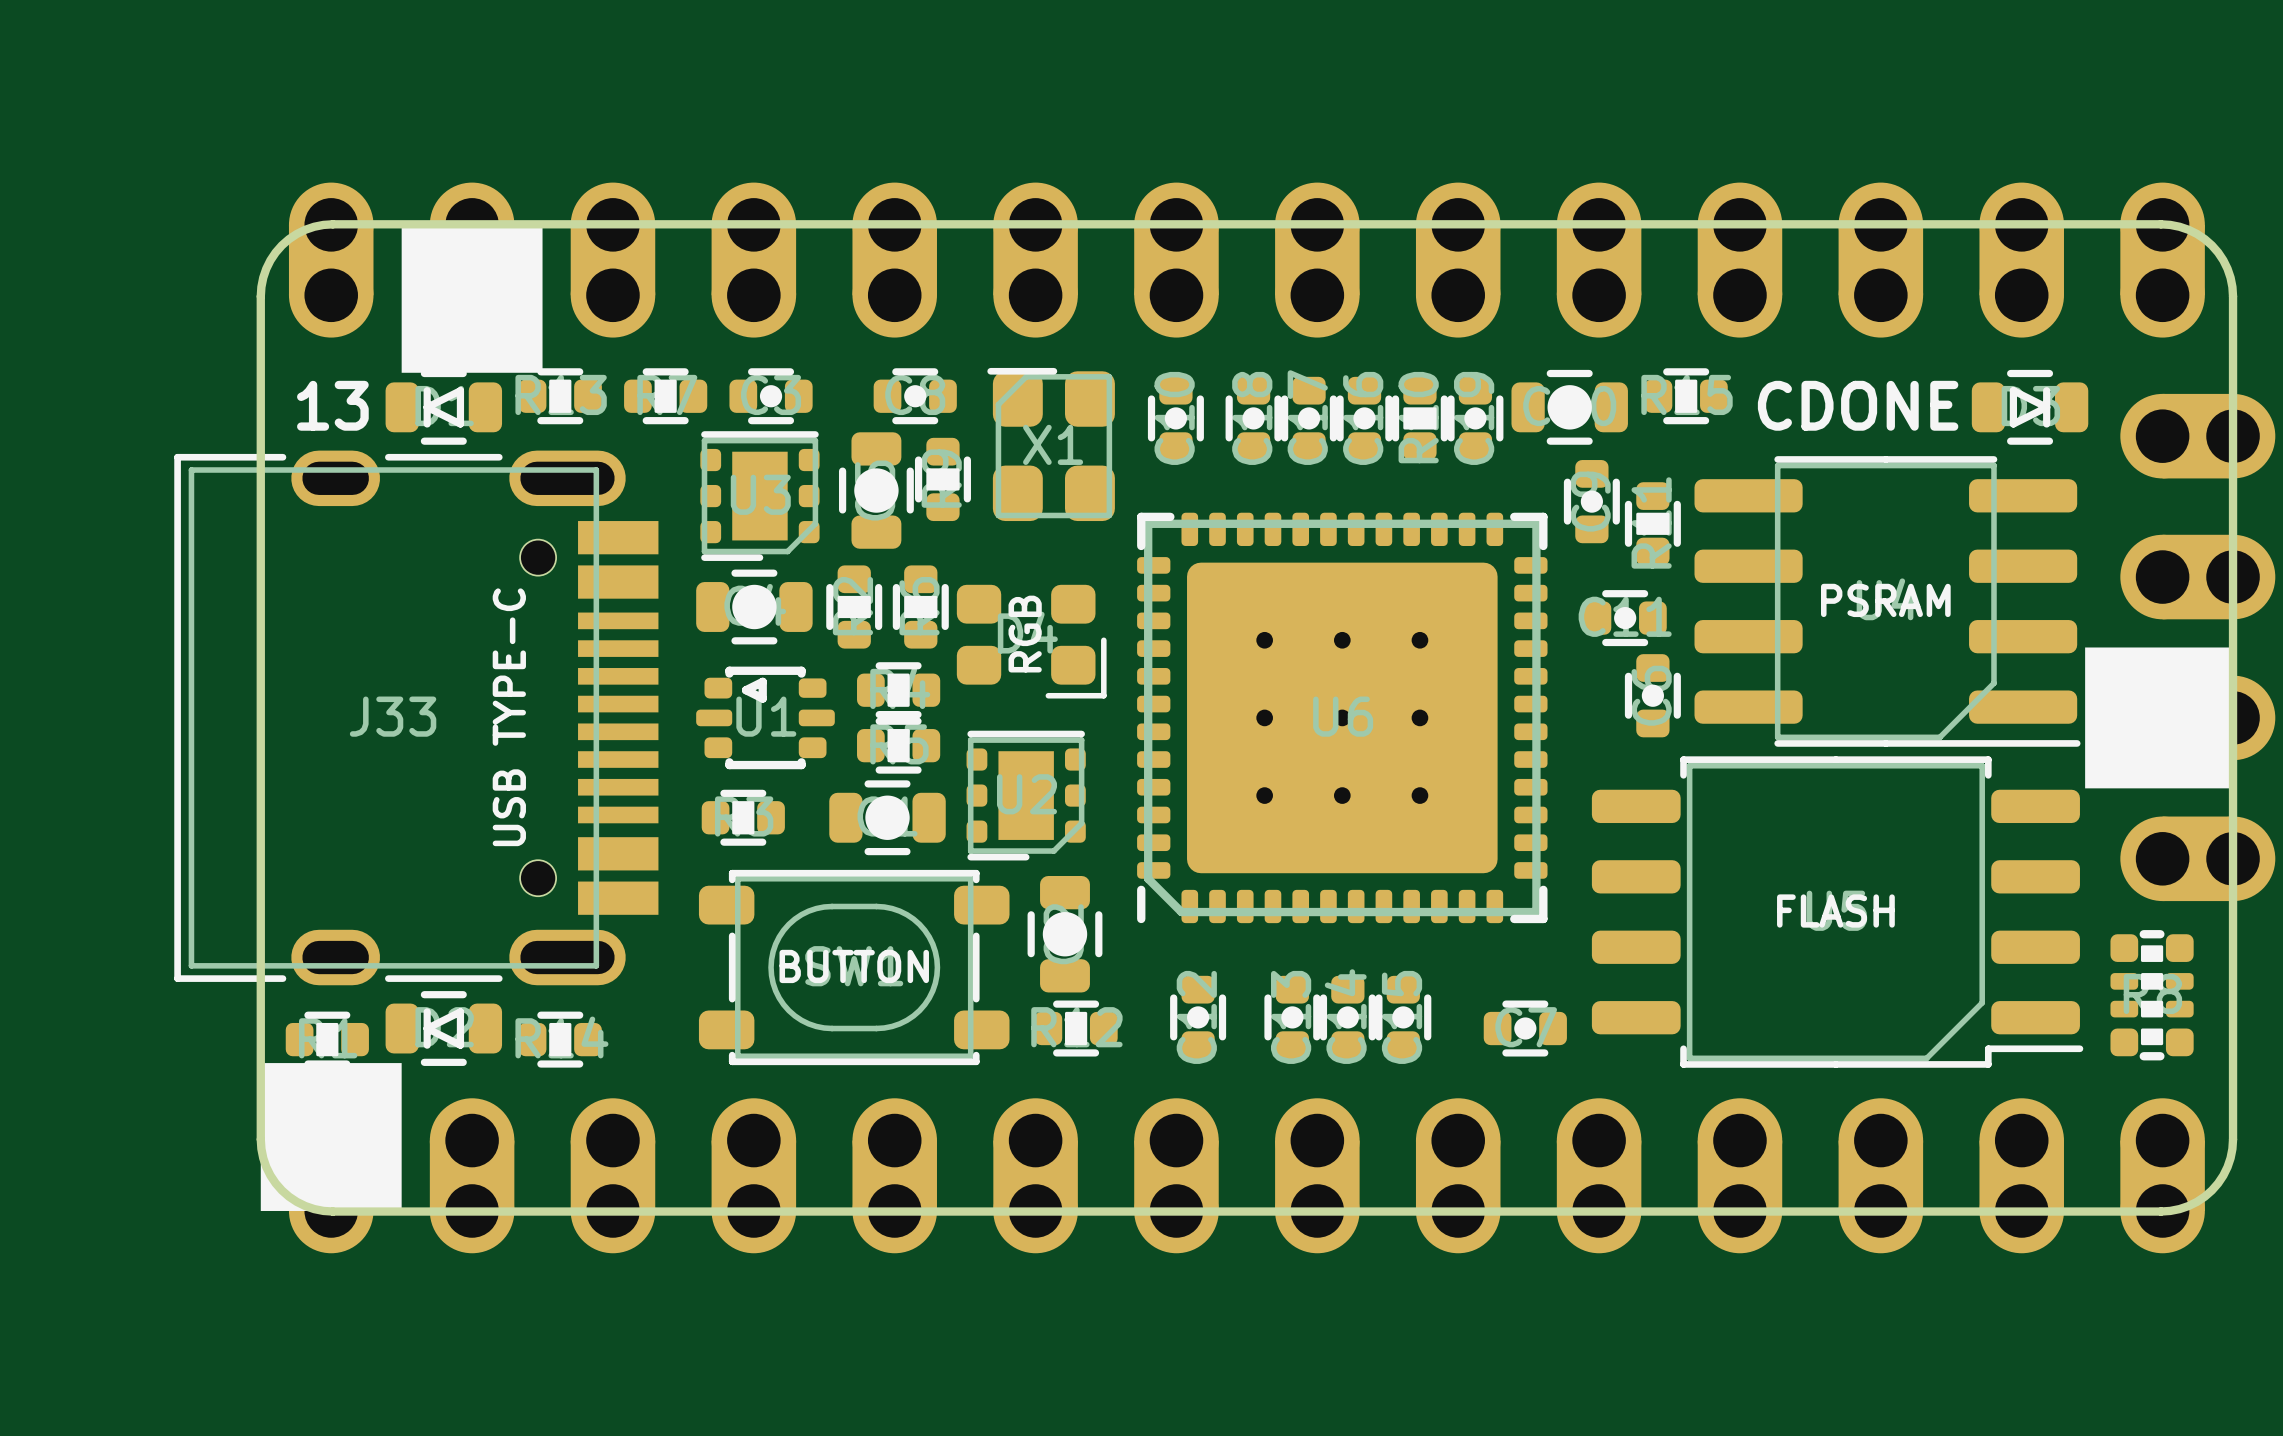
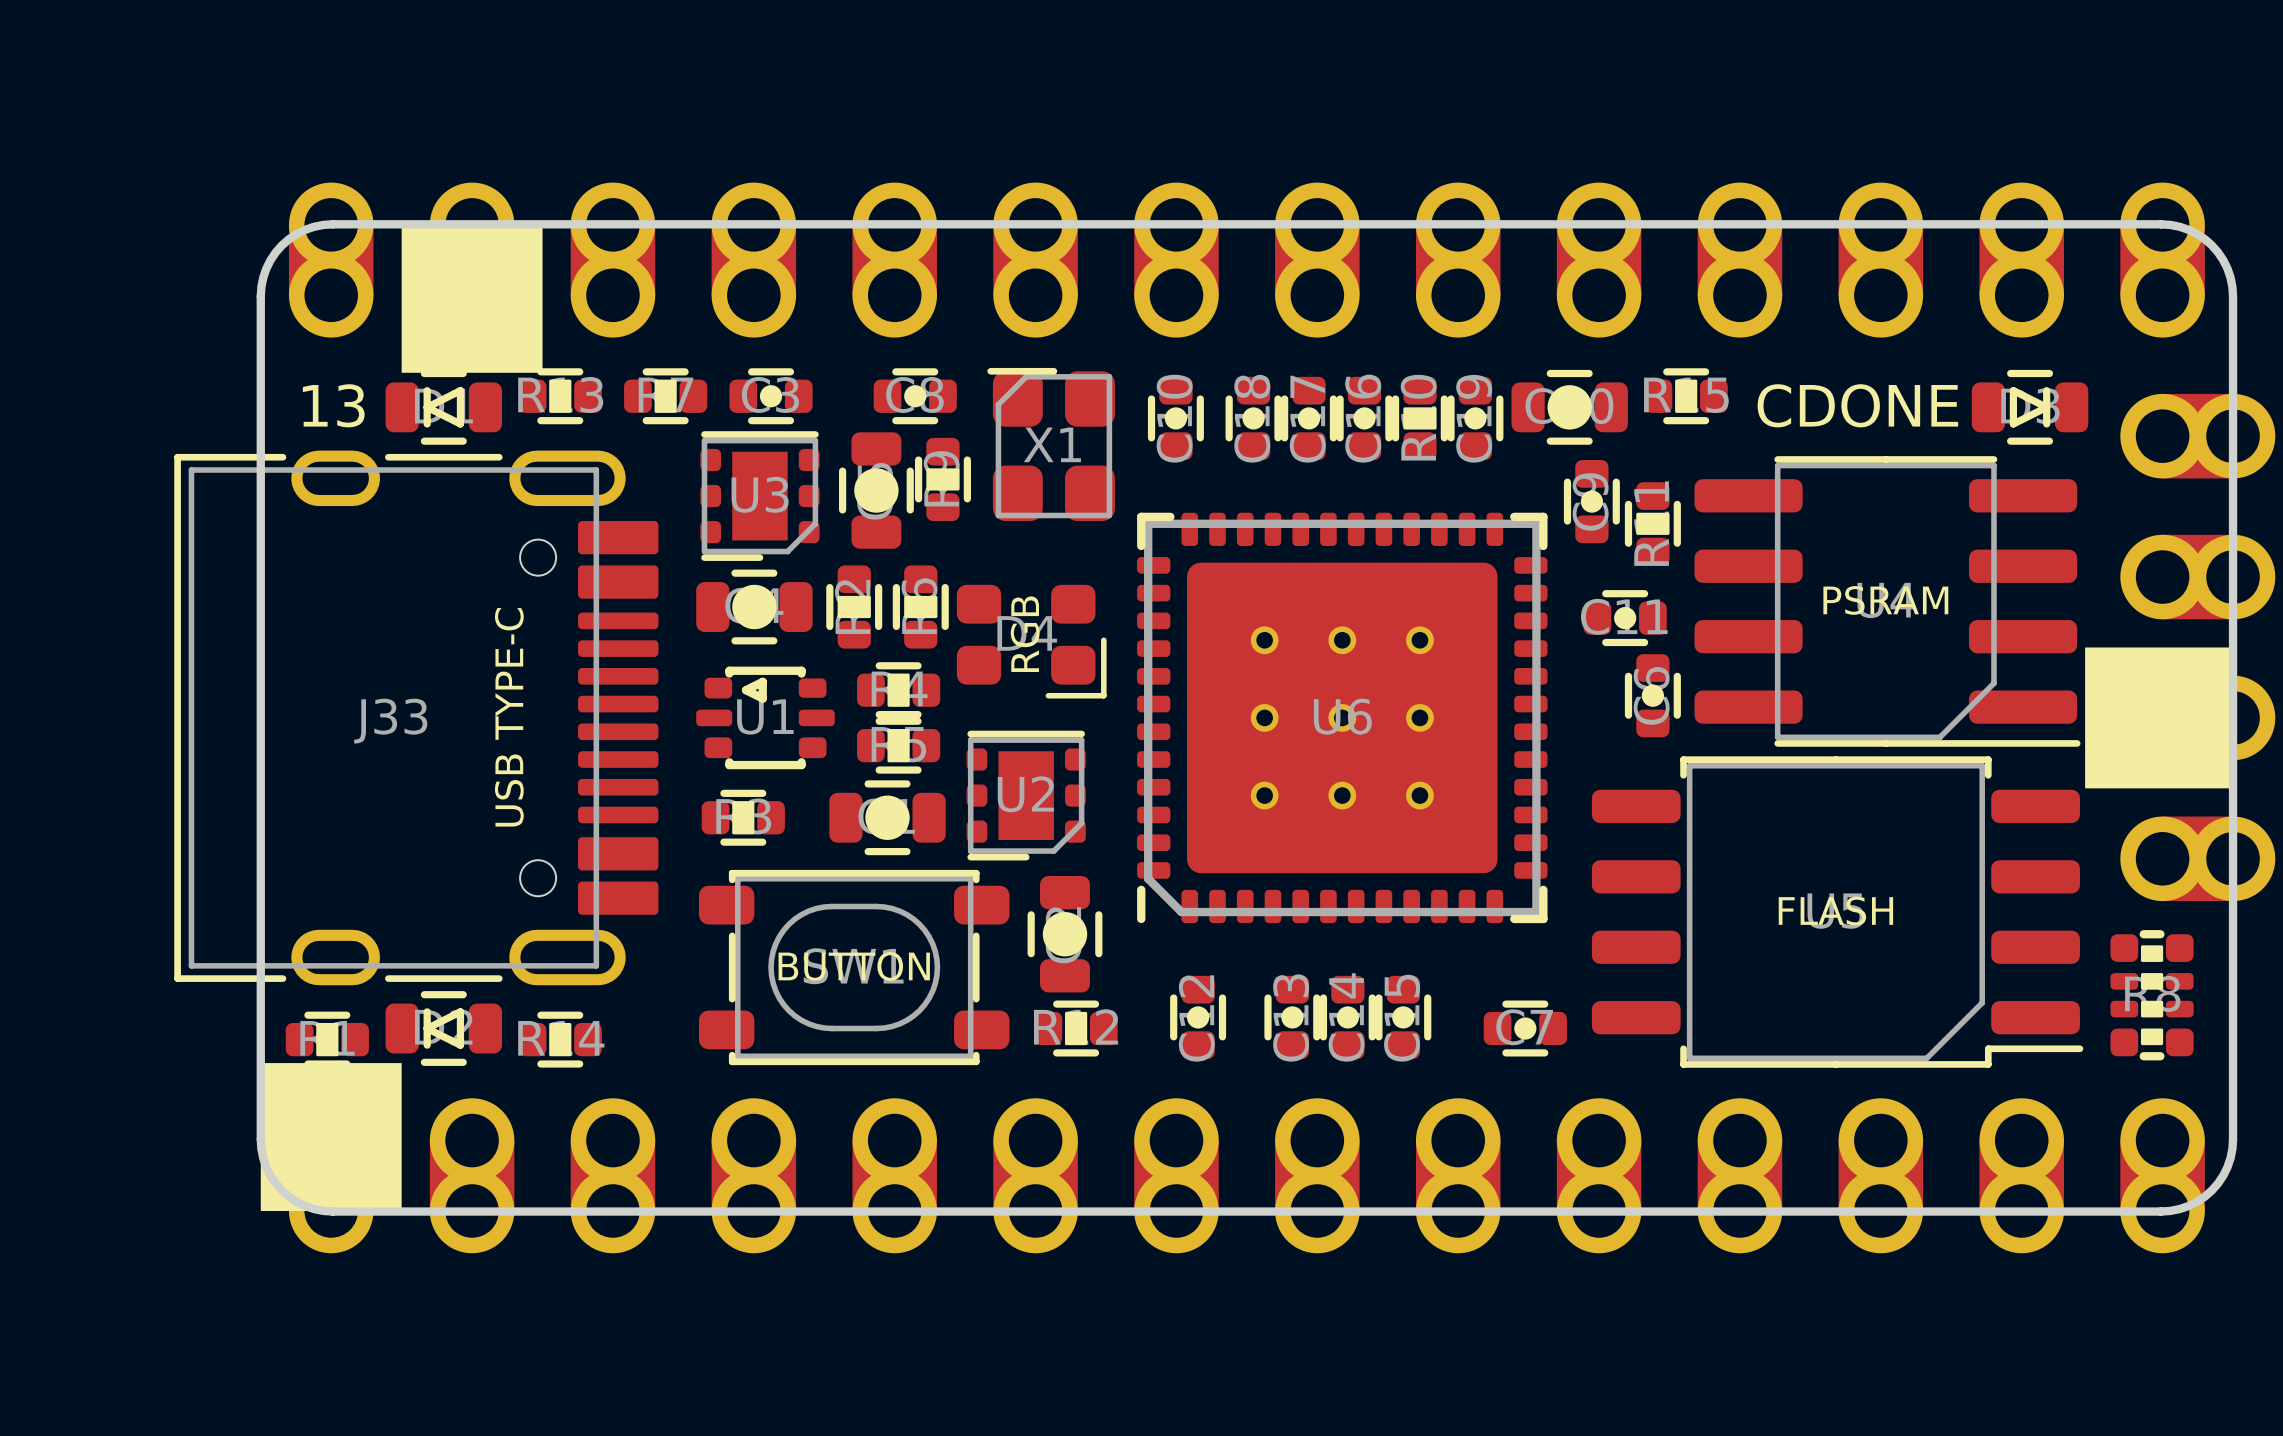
J33 footprint: [174, 450, 659, 986] -> [174, 450, 659, 986]

